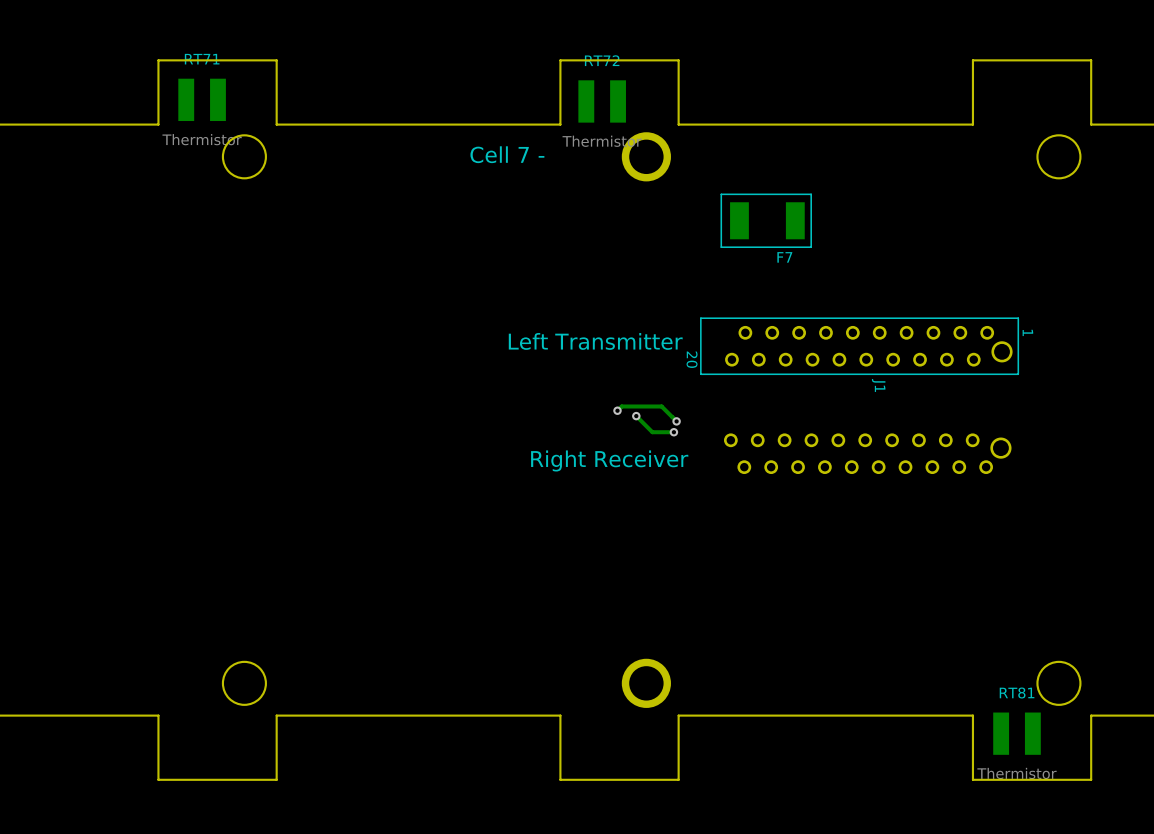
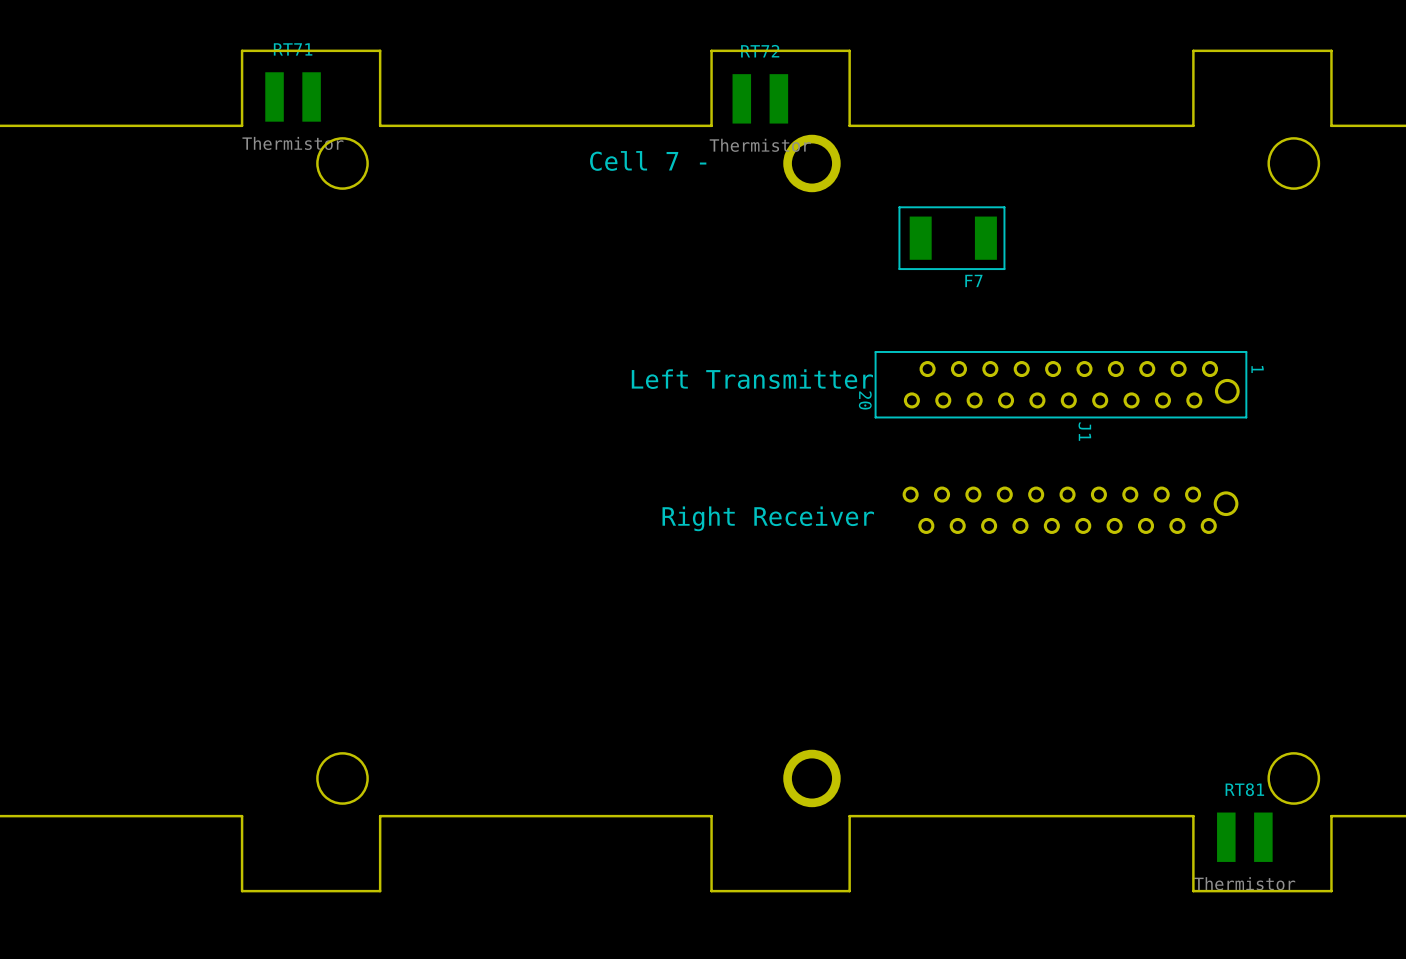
track: (617, 410) (621, 406) (661, 406) (676, 421) -> none
via: (617, 410) -> none
track: (636, 416) (652, 432) (673, 432) -> none
via: (636, 416) -> none
via: (676, 421) -> none
via: (673, 432) -> none

